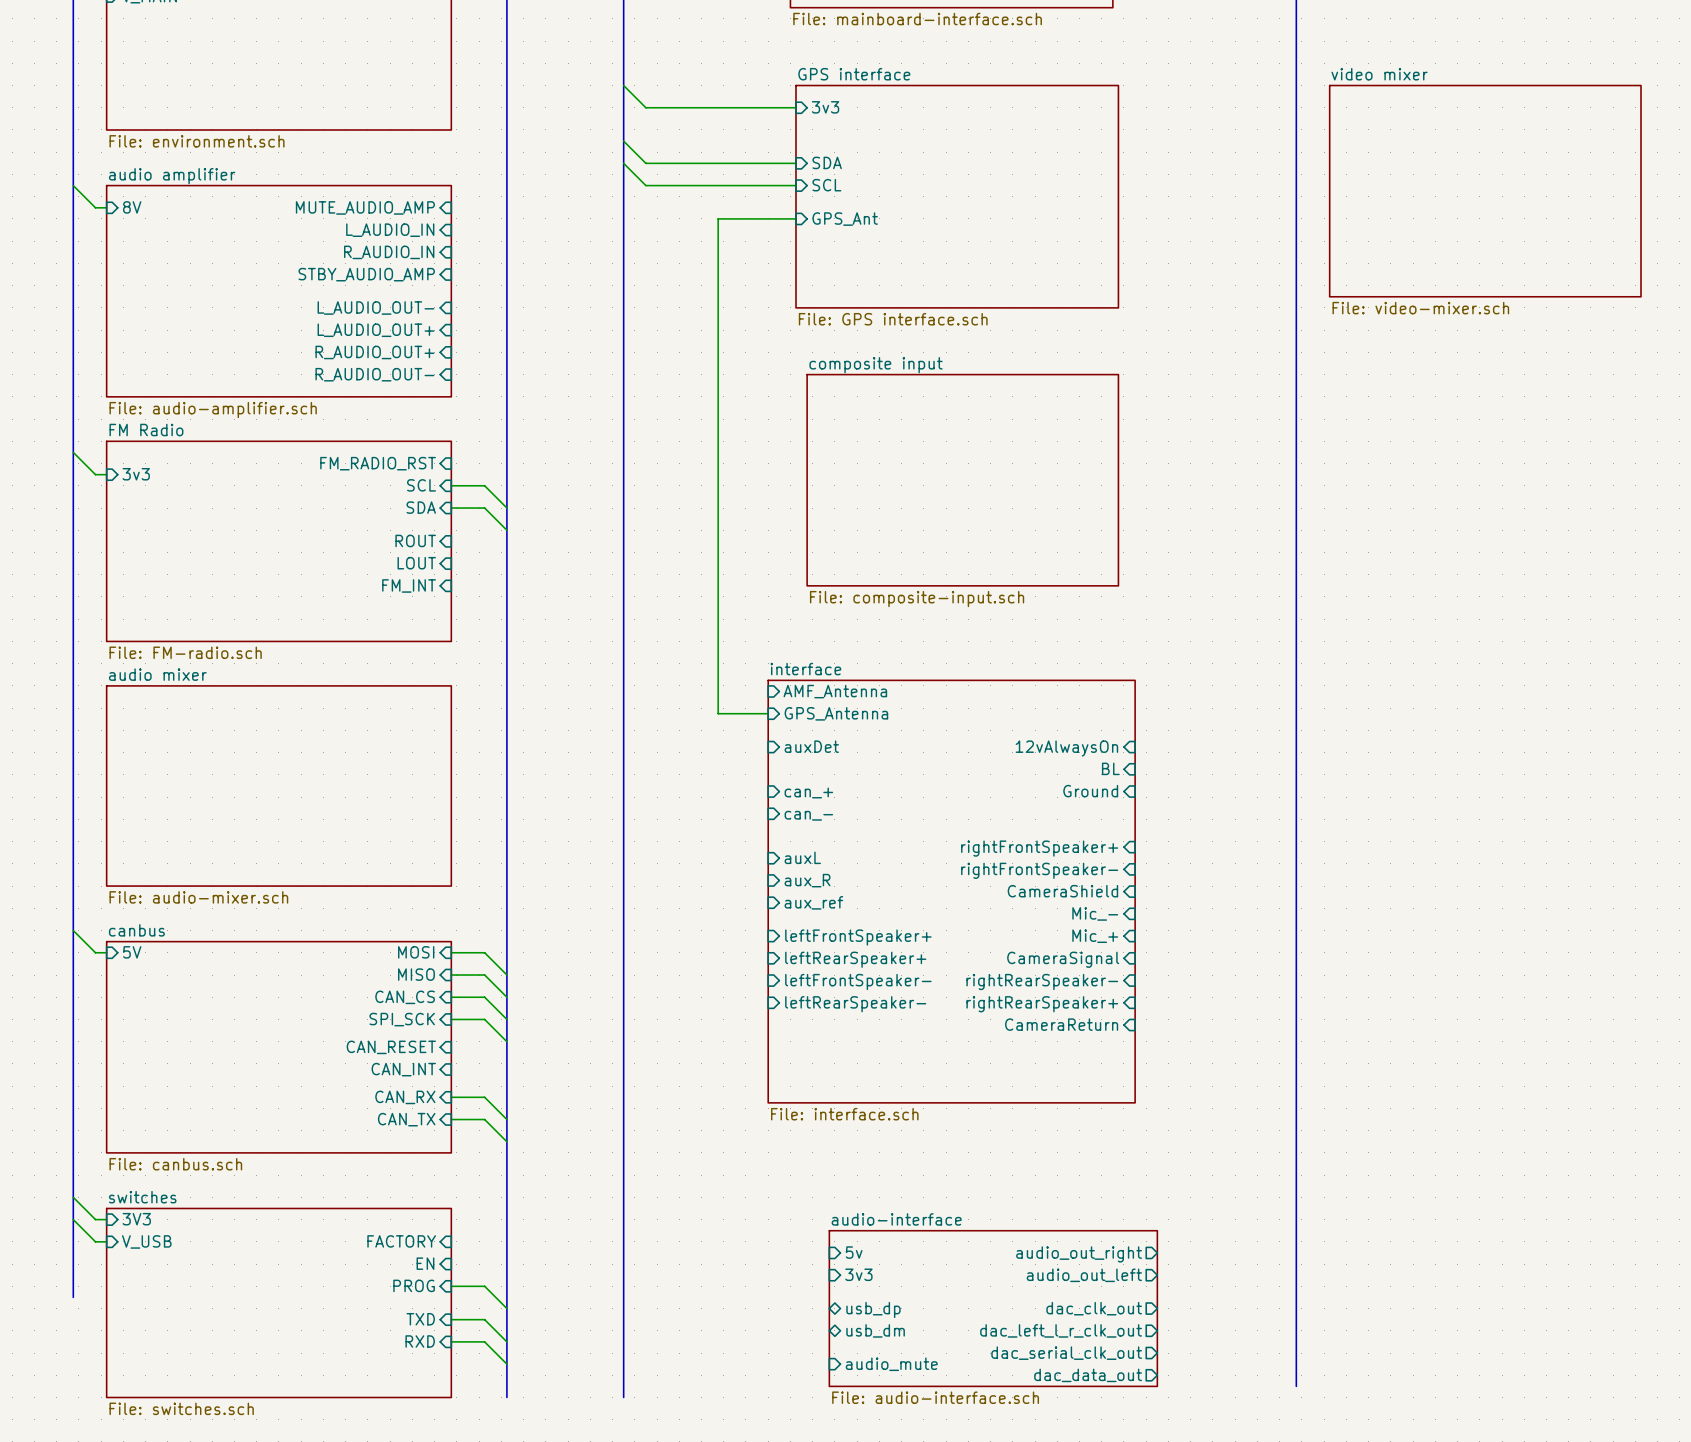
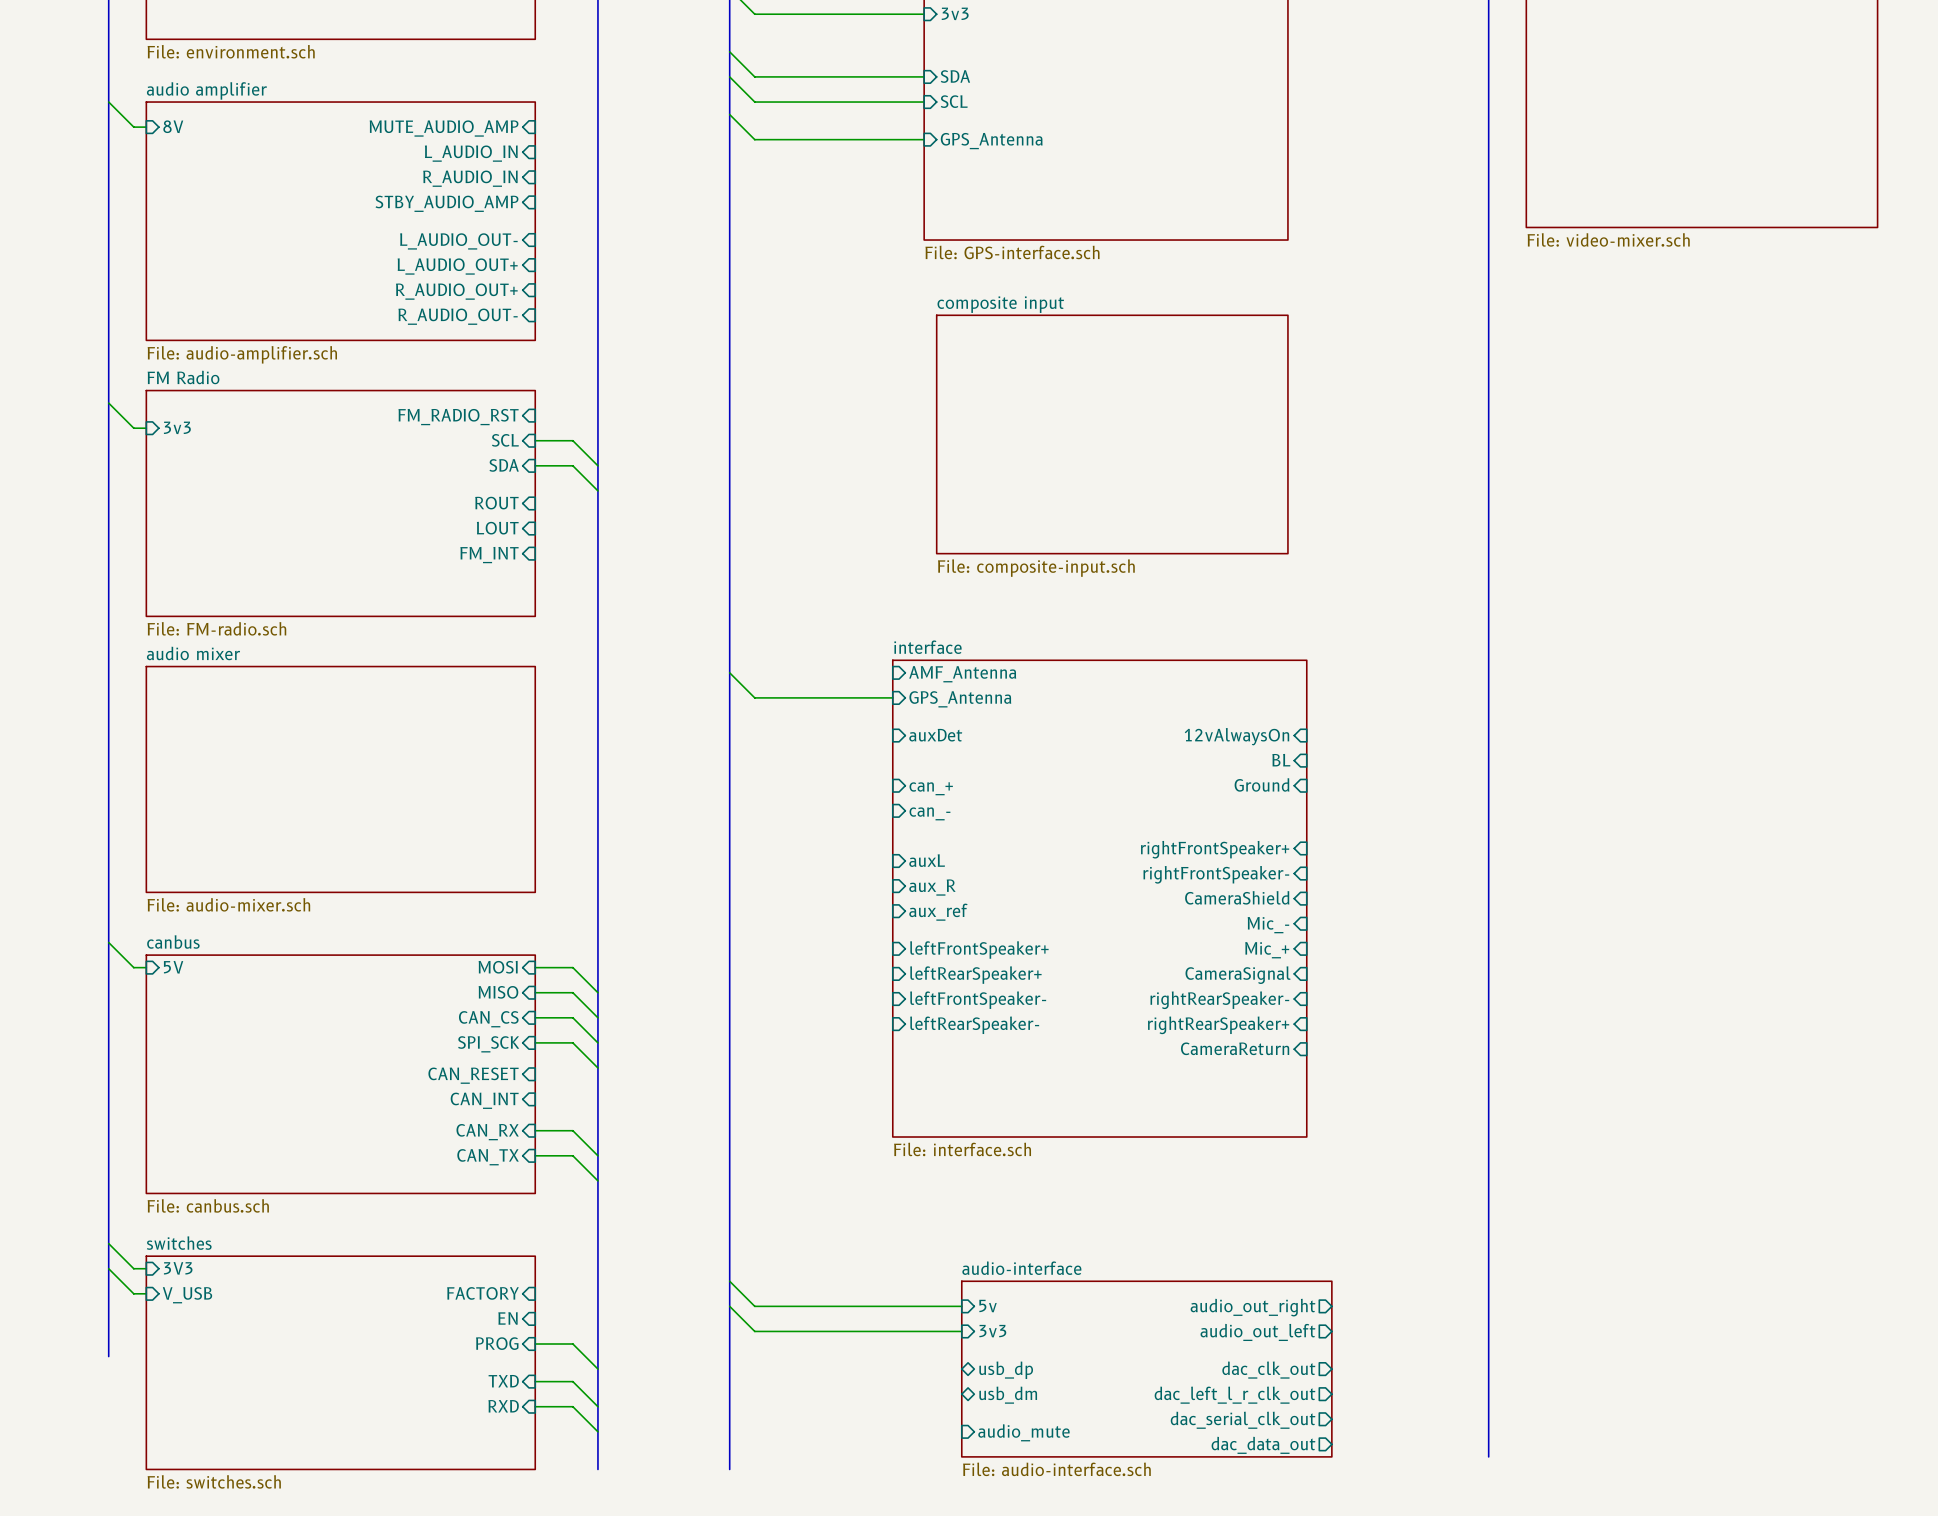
wire: none -> (729, 114) (754, 139) (836, 139)
wire: (718, 218) (718, 713) -> (729, 672) (754, 697) (836, 697)
sheet pin: GPS_Ant (845, 219) -> GPS_Antenna (991, 141)
sheet GPS interface value: File: GPS interface.sch (893, 319) -> File: GPS-interface.sch (1012, 252)
wire: none -> (729, 1281) (754, 1306) (961, 1306)
wire: none -> (729, 1306) (754, 1331) (961, 1331)

